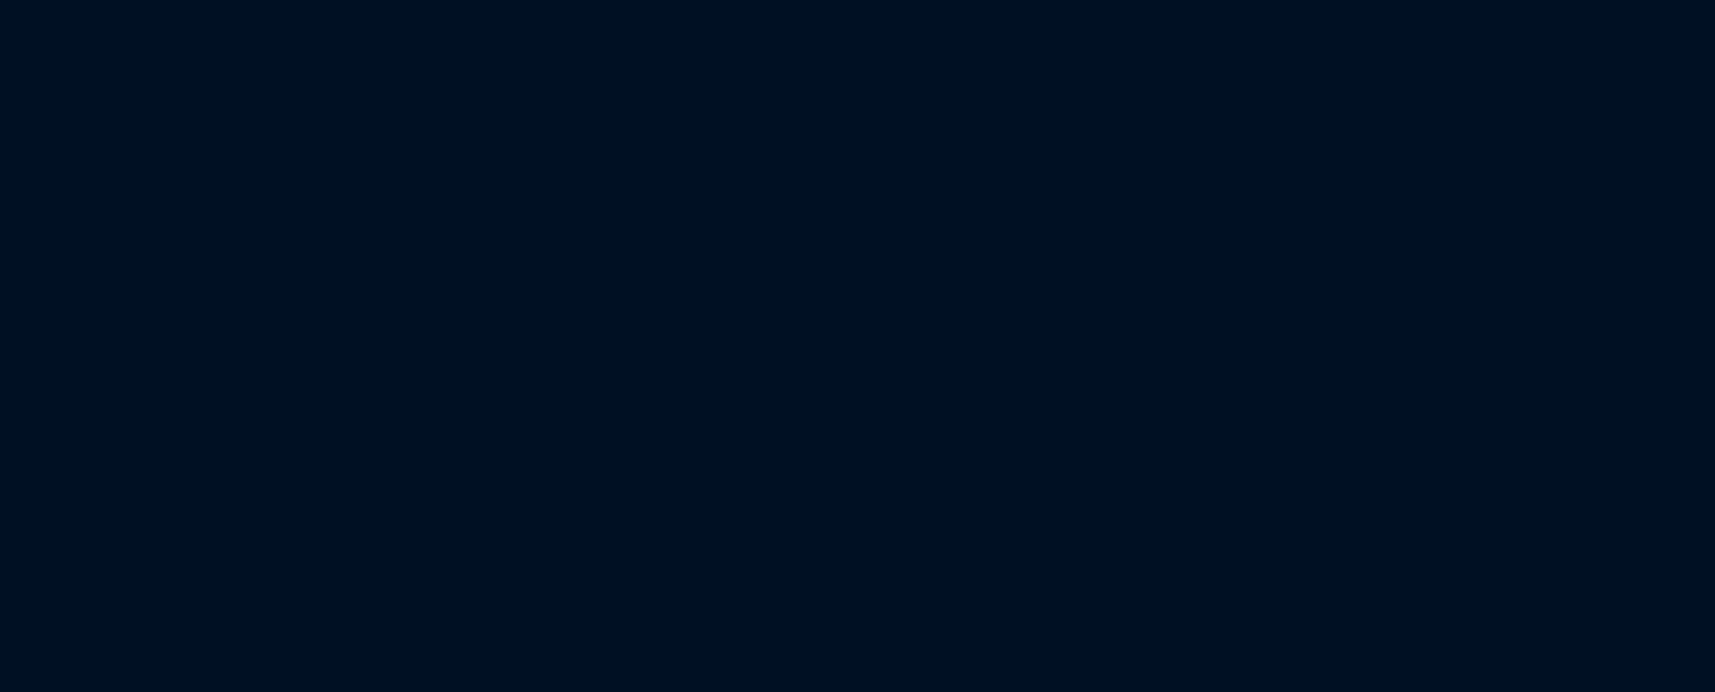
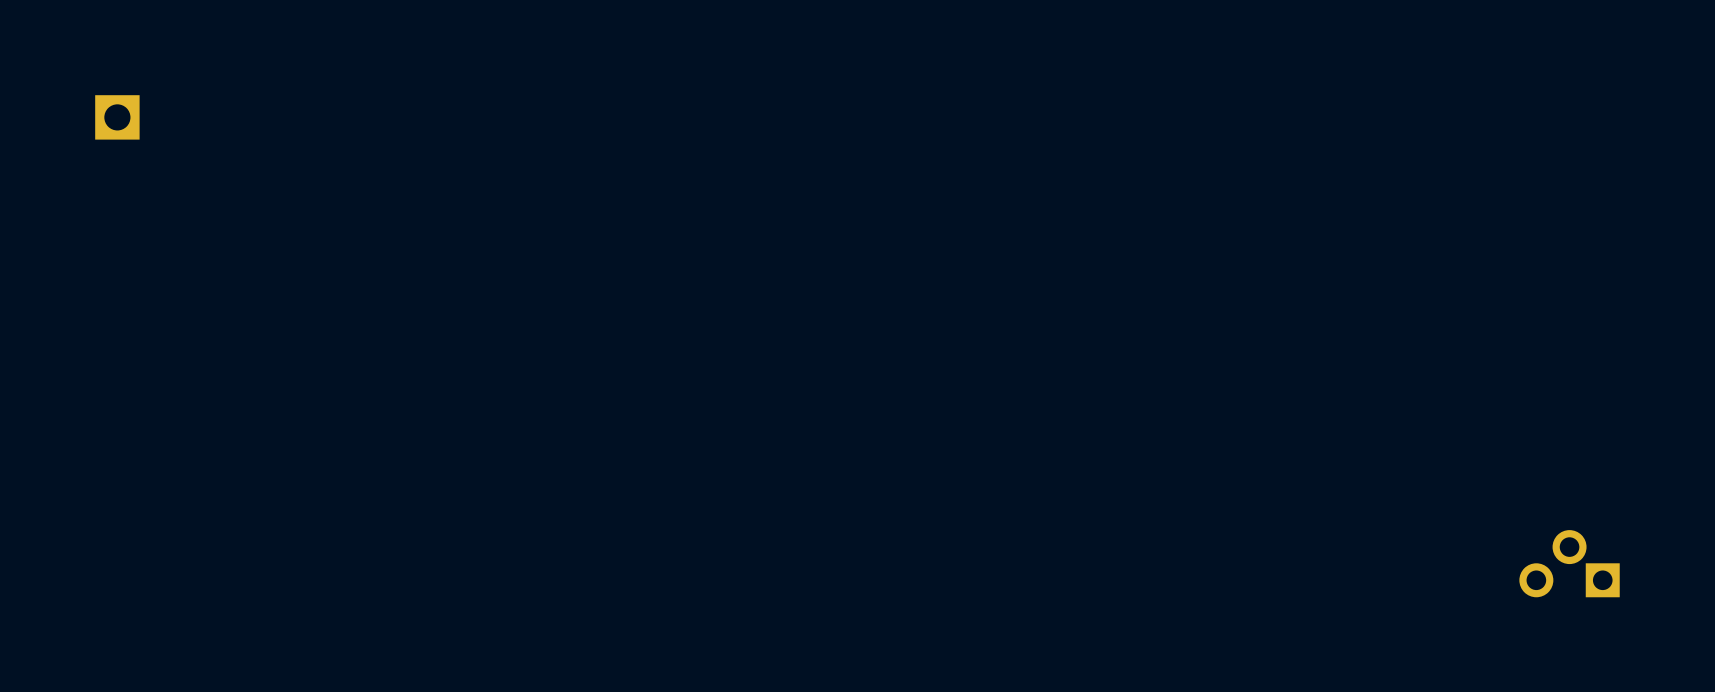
part: none -> (117, 117)
part: none -> (1569, 563)

